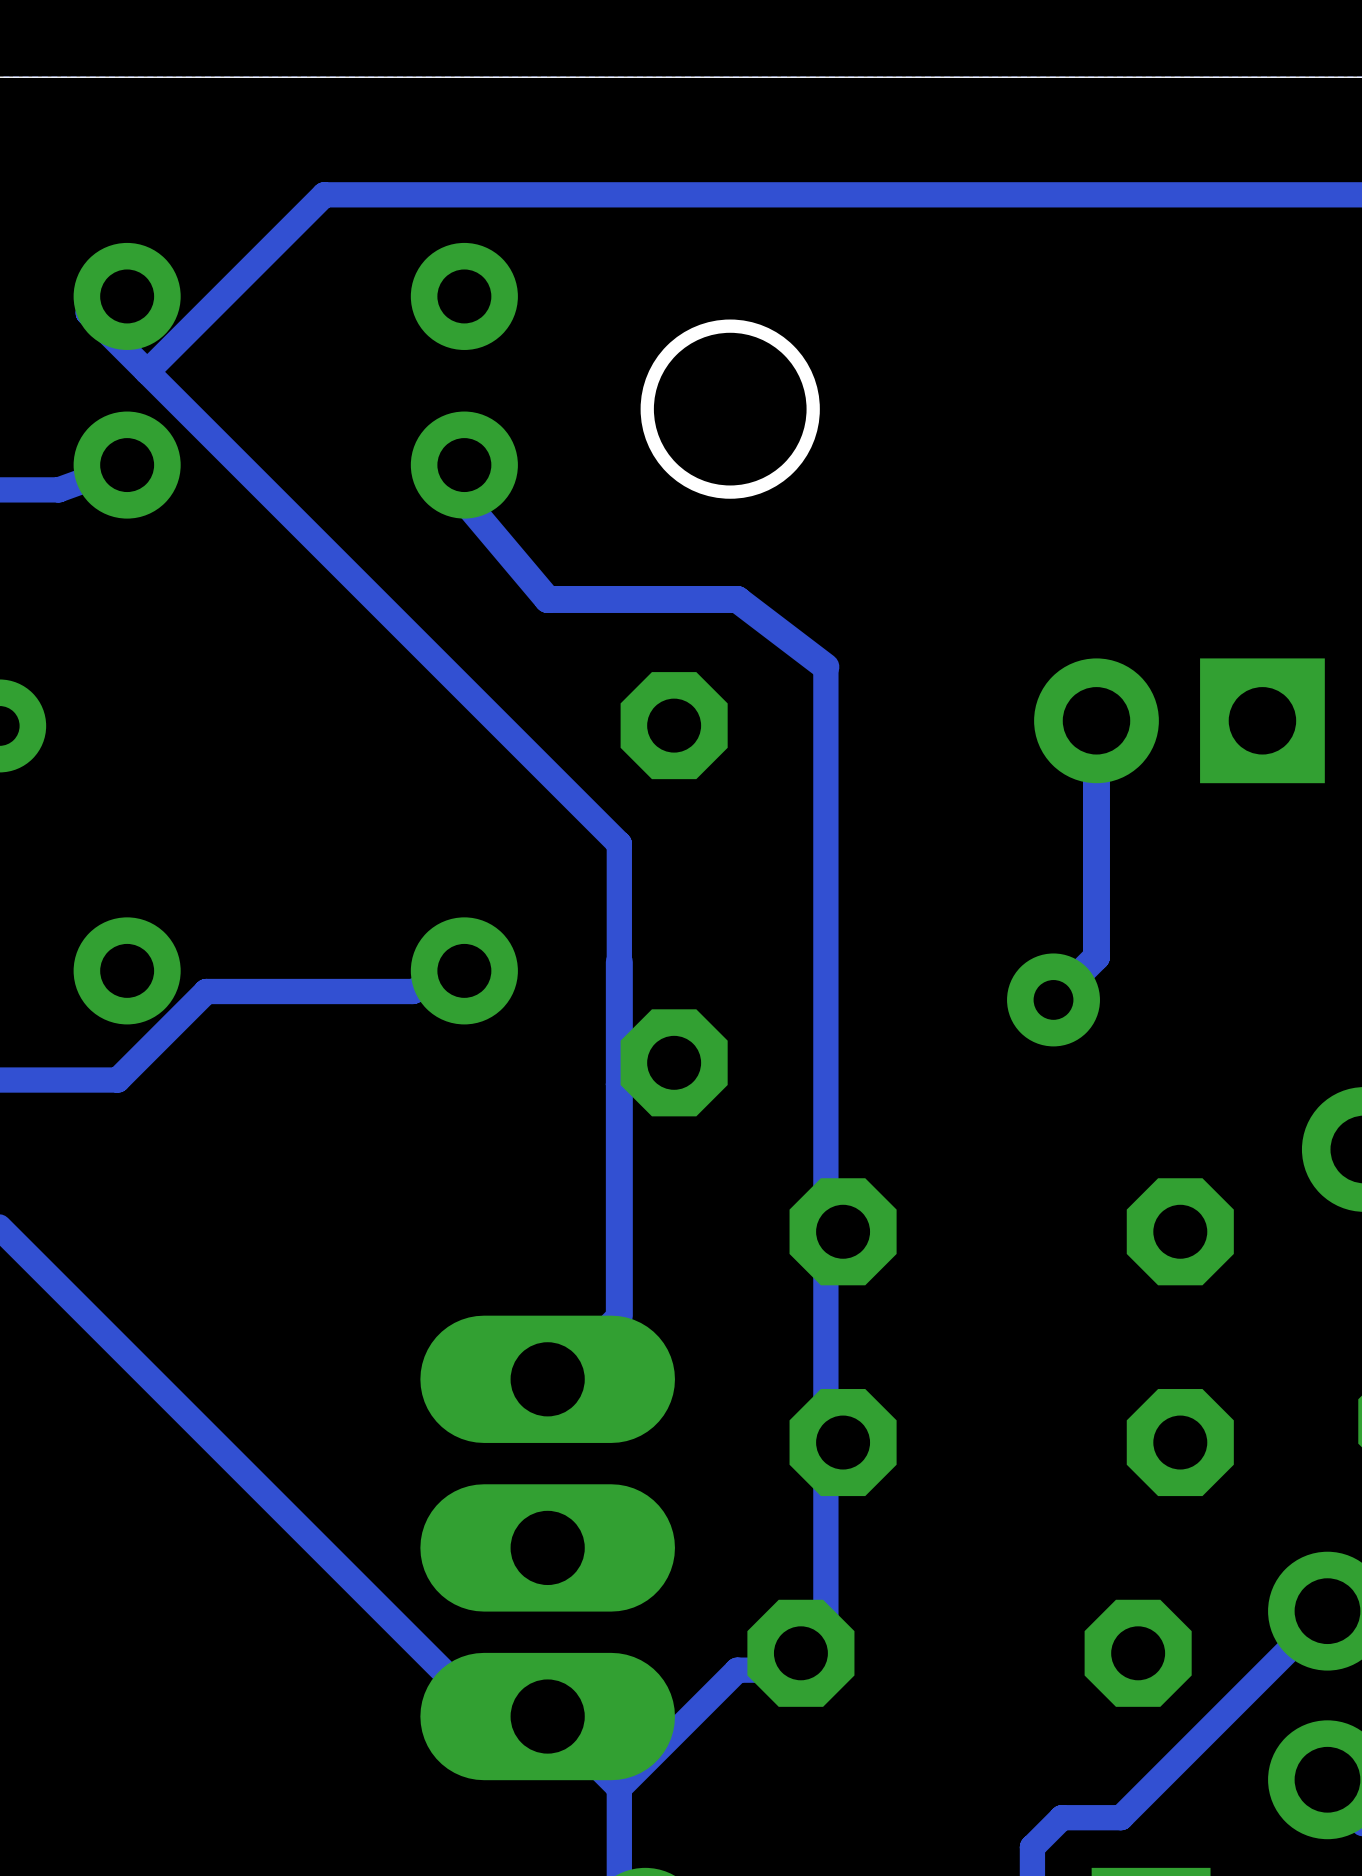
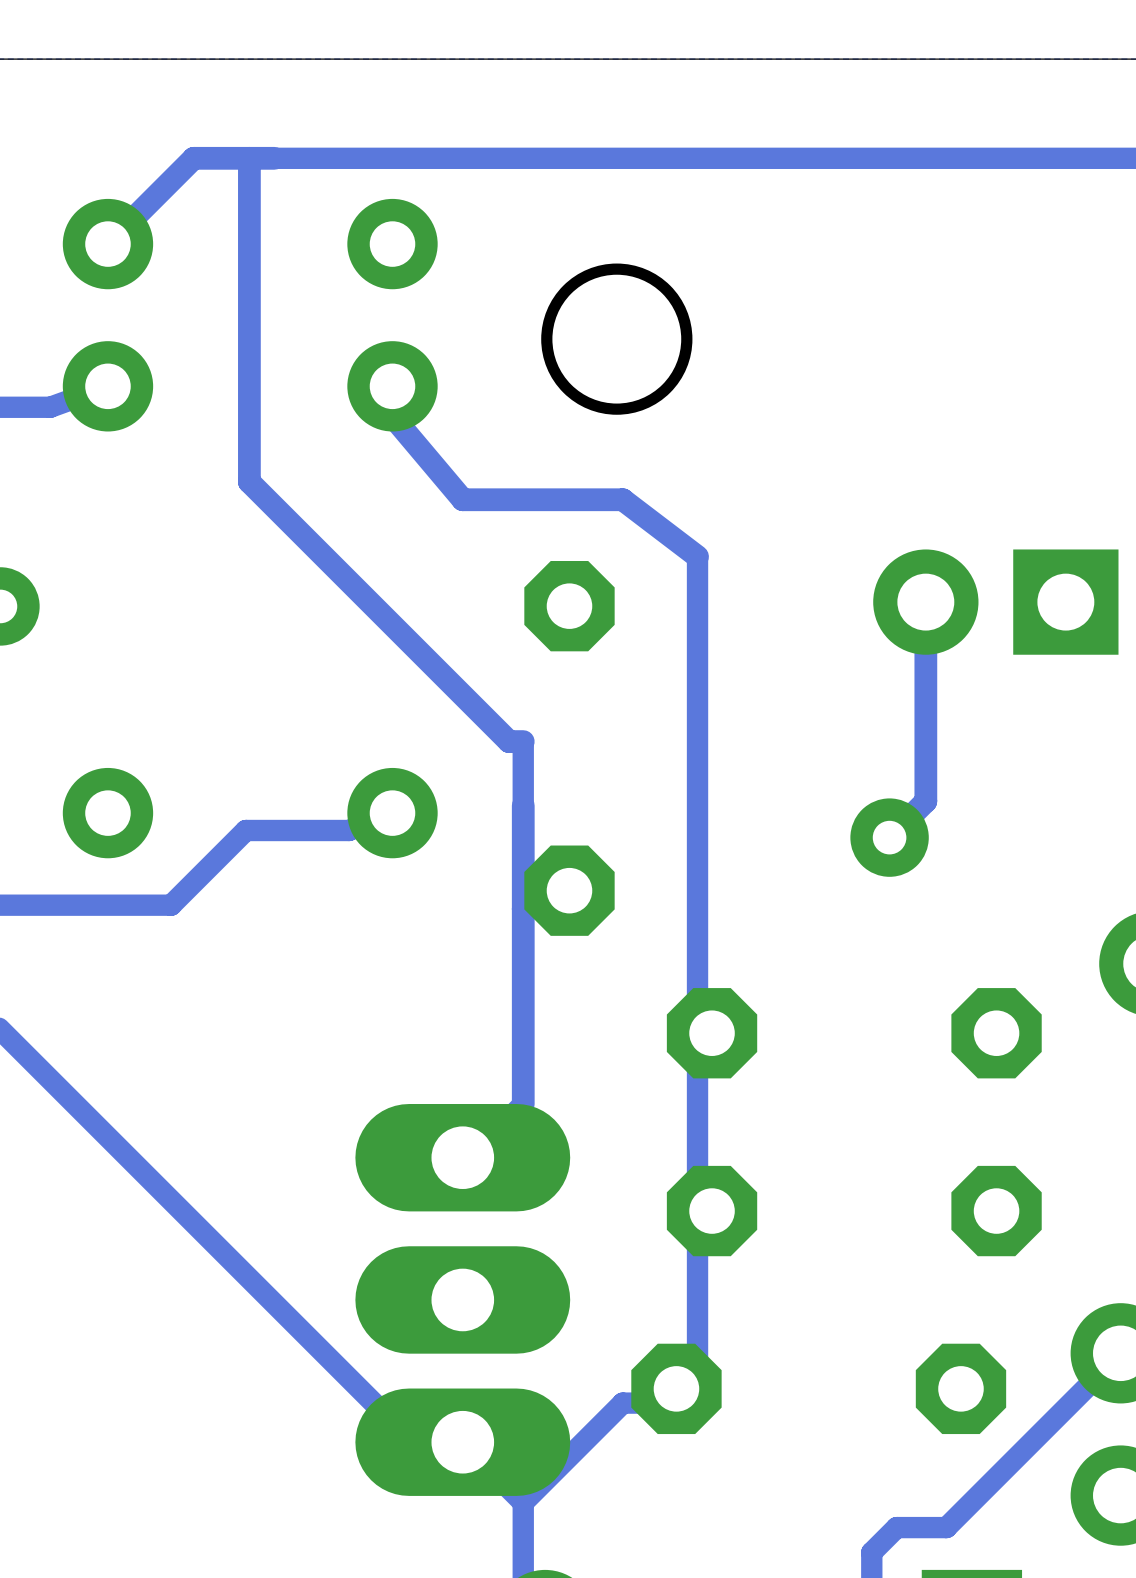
track: (324, 194) (147, 371) -> (274, 158) (193, 158) (107, 244)
track: (127, 296) (88, 312) (619, 843) (619, 886) -> (249, 158) (249, 481) (509, 741) (523, 741)
track: (290, 991) (206, 991) (117, 1080) -> (245, 830) (171, 905) (100, 905)

